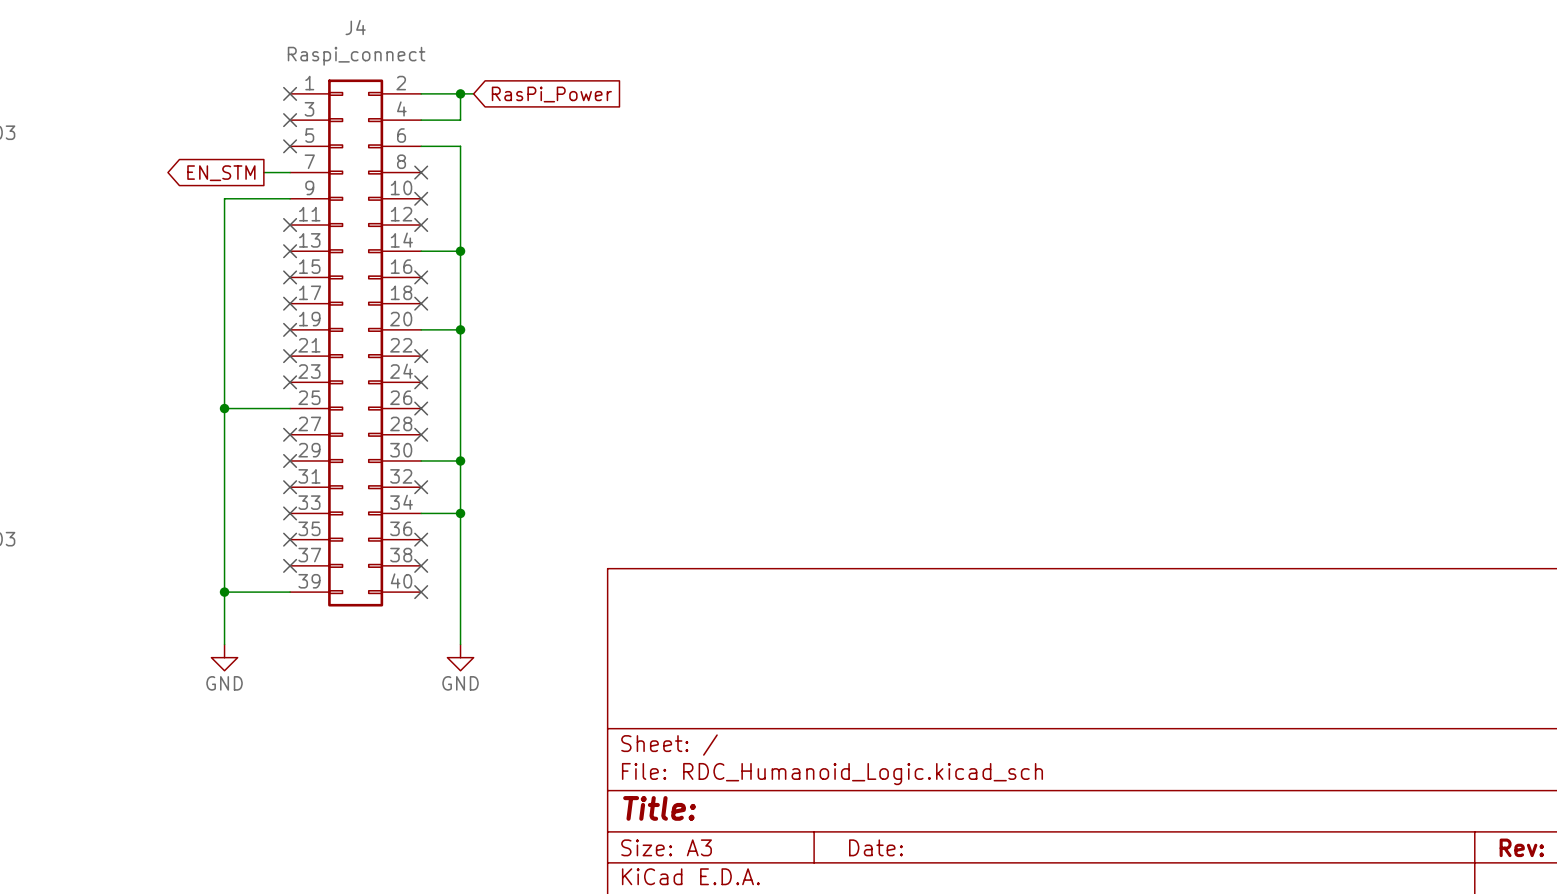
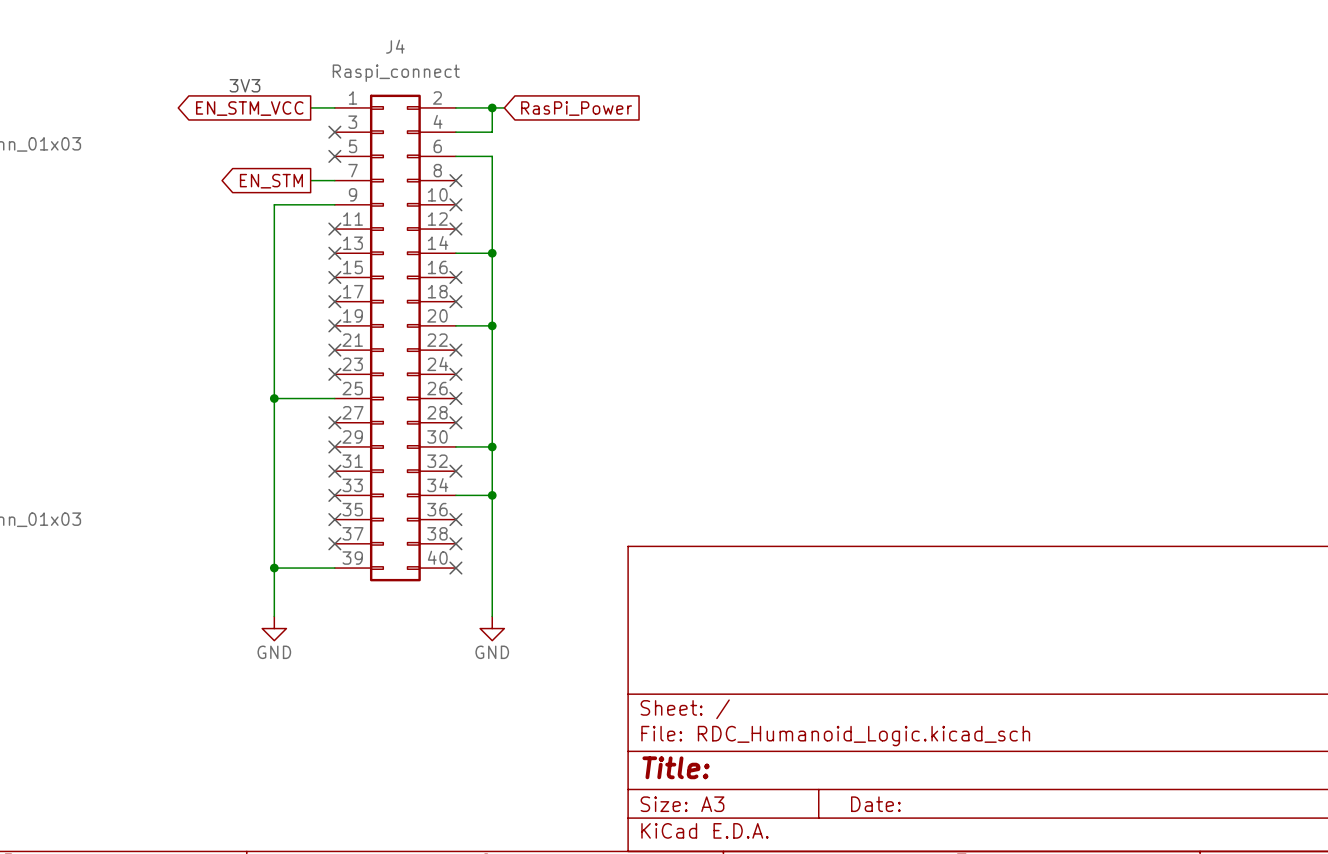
text: none -> 3V3 (244, 85)
wire: none -> (310, 107) (334, 107)
no-connect mark: (290, 93) -> none
global label: none -> EN_STM_VCC (249, 108)

